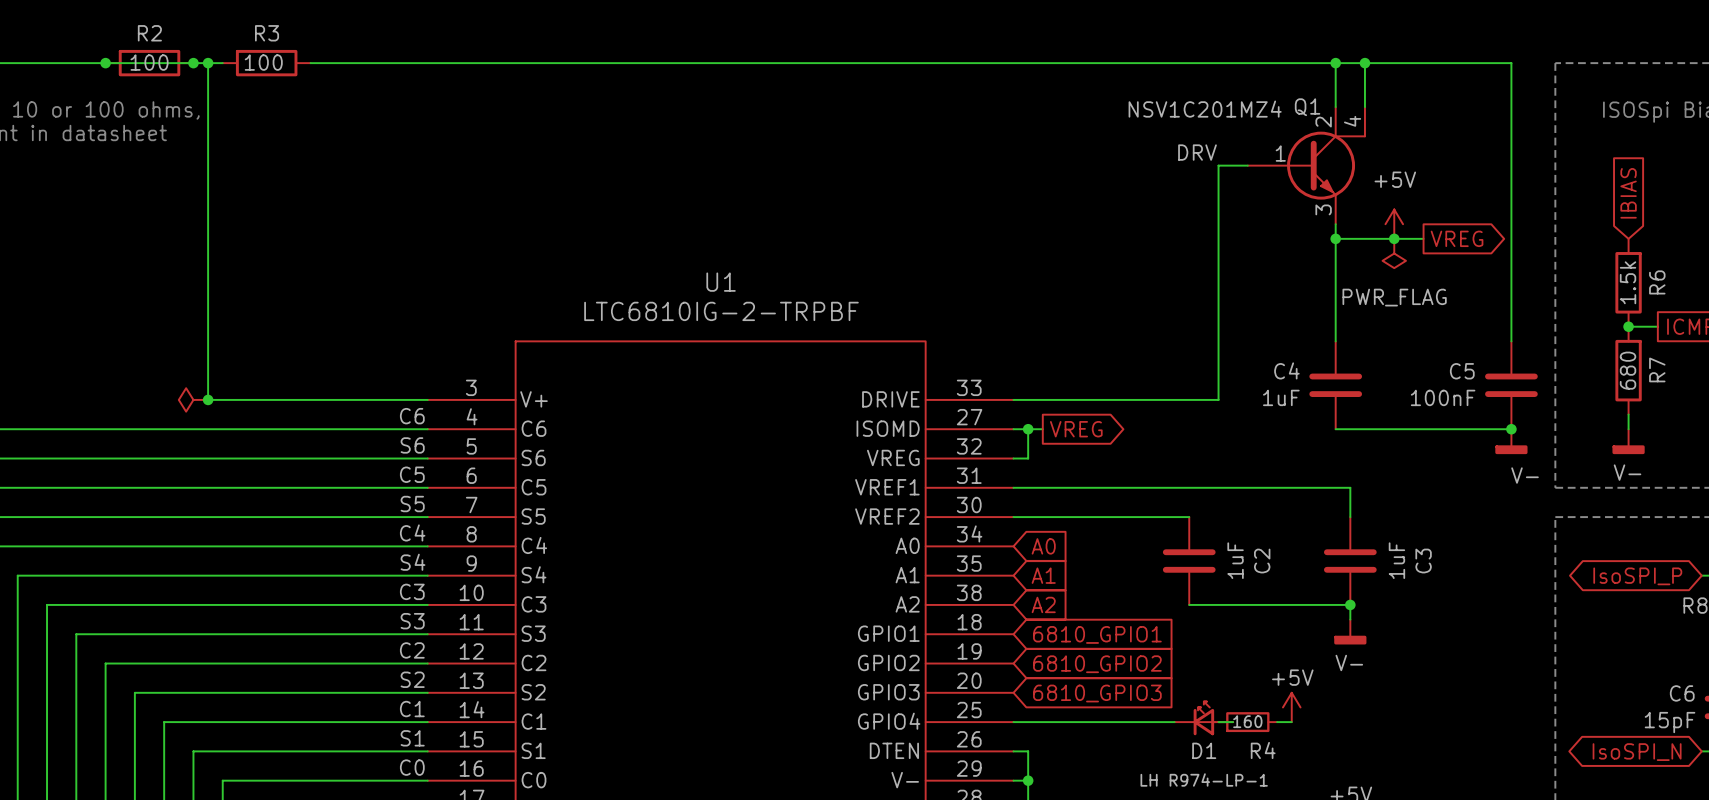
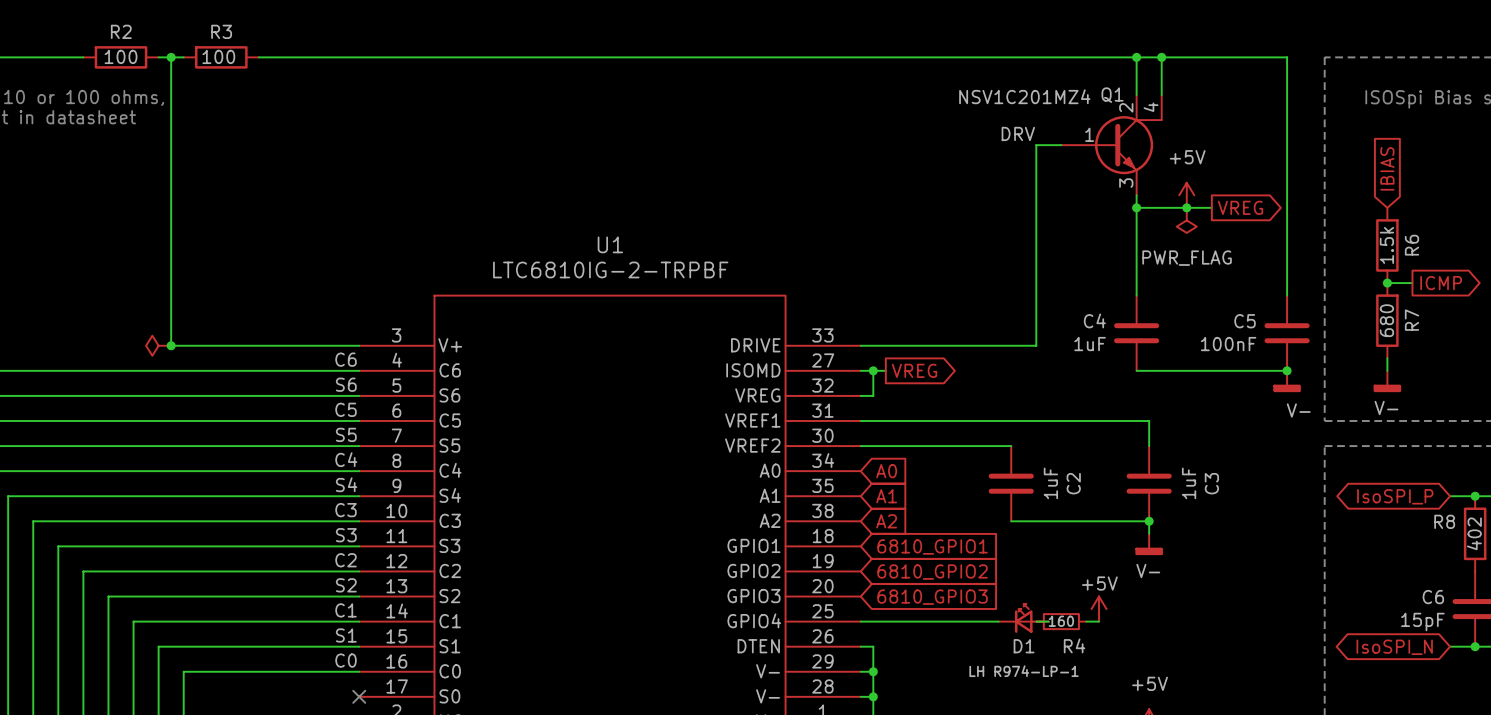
wire: (105, 63) (193, 63) -> none
junction: (105, 63) -> none
junction: (193, 63) -> none

